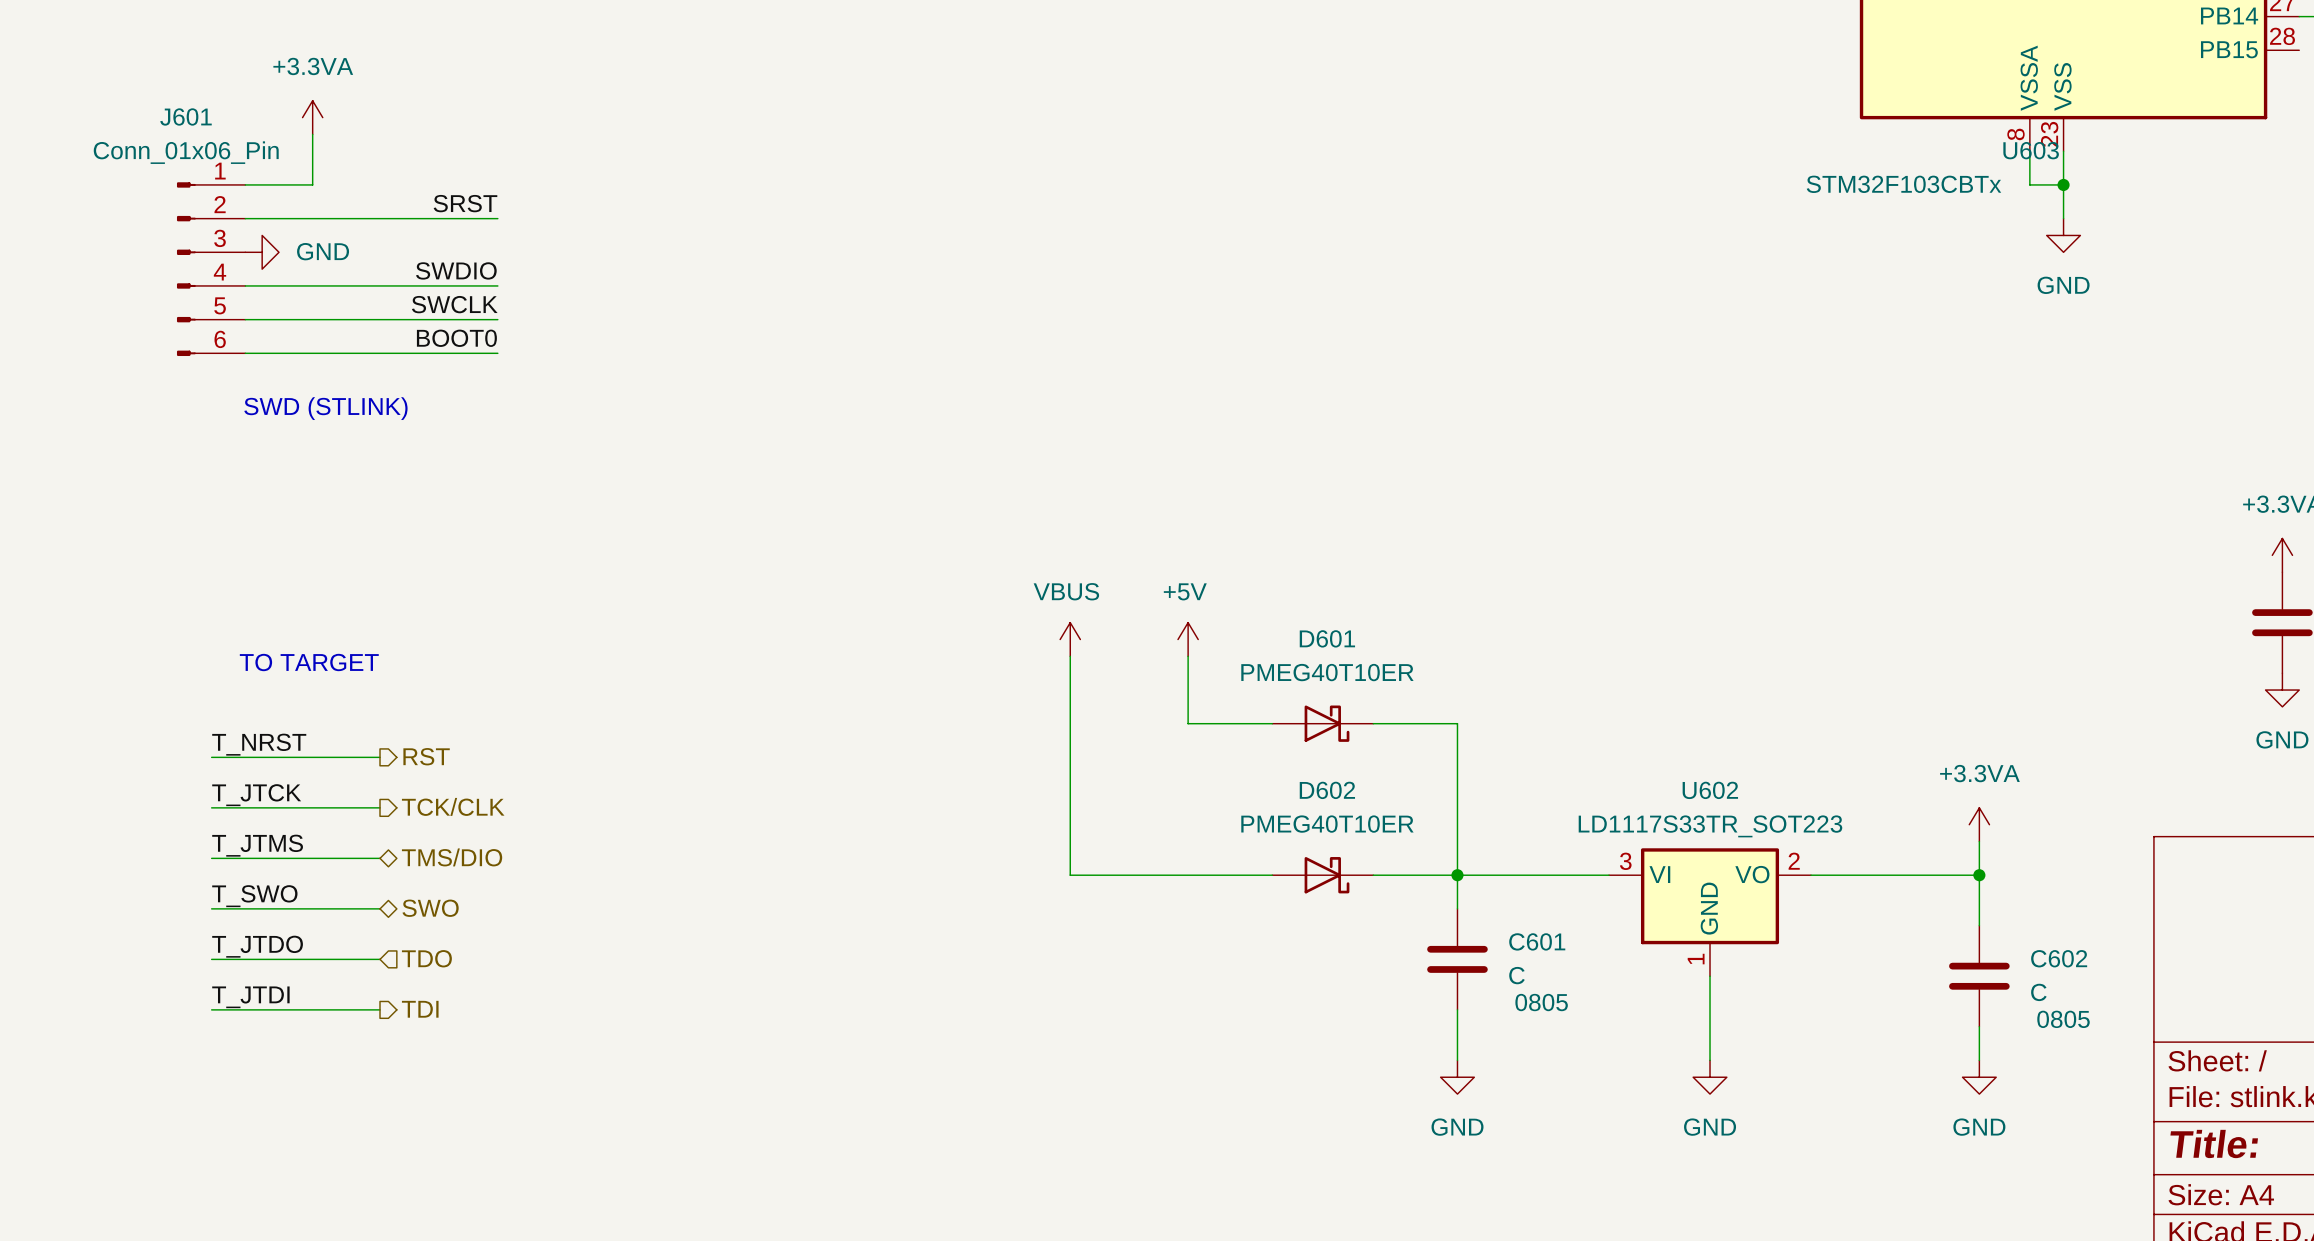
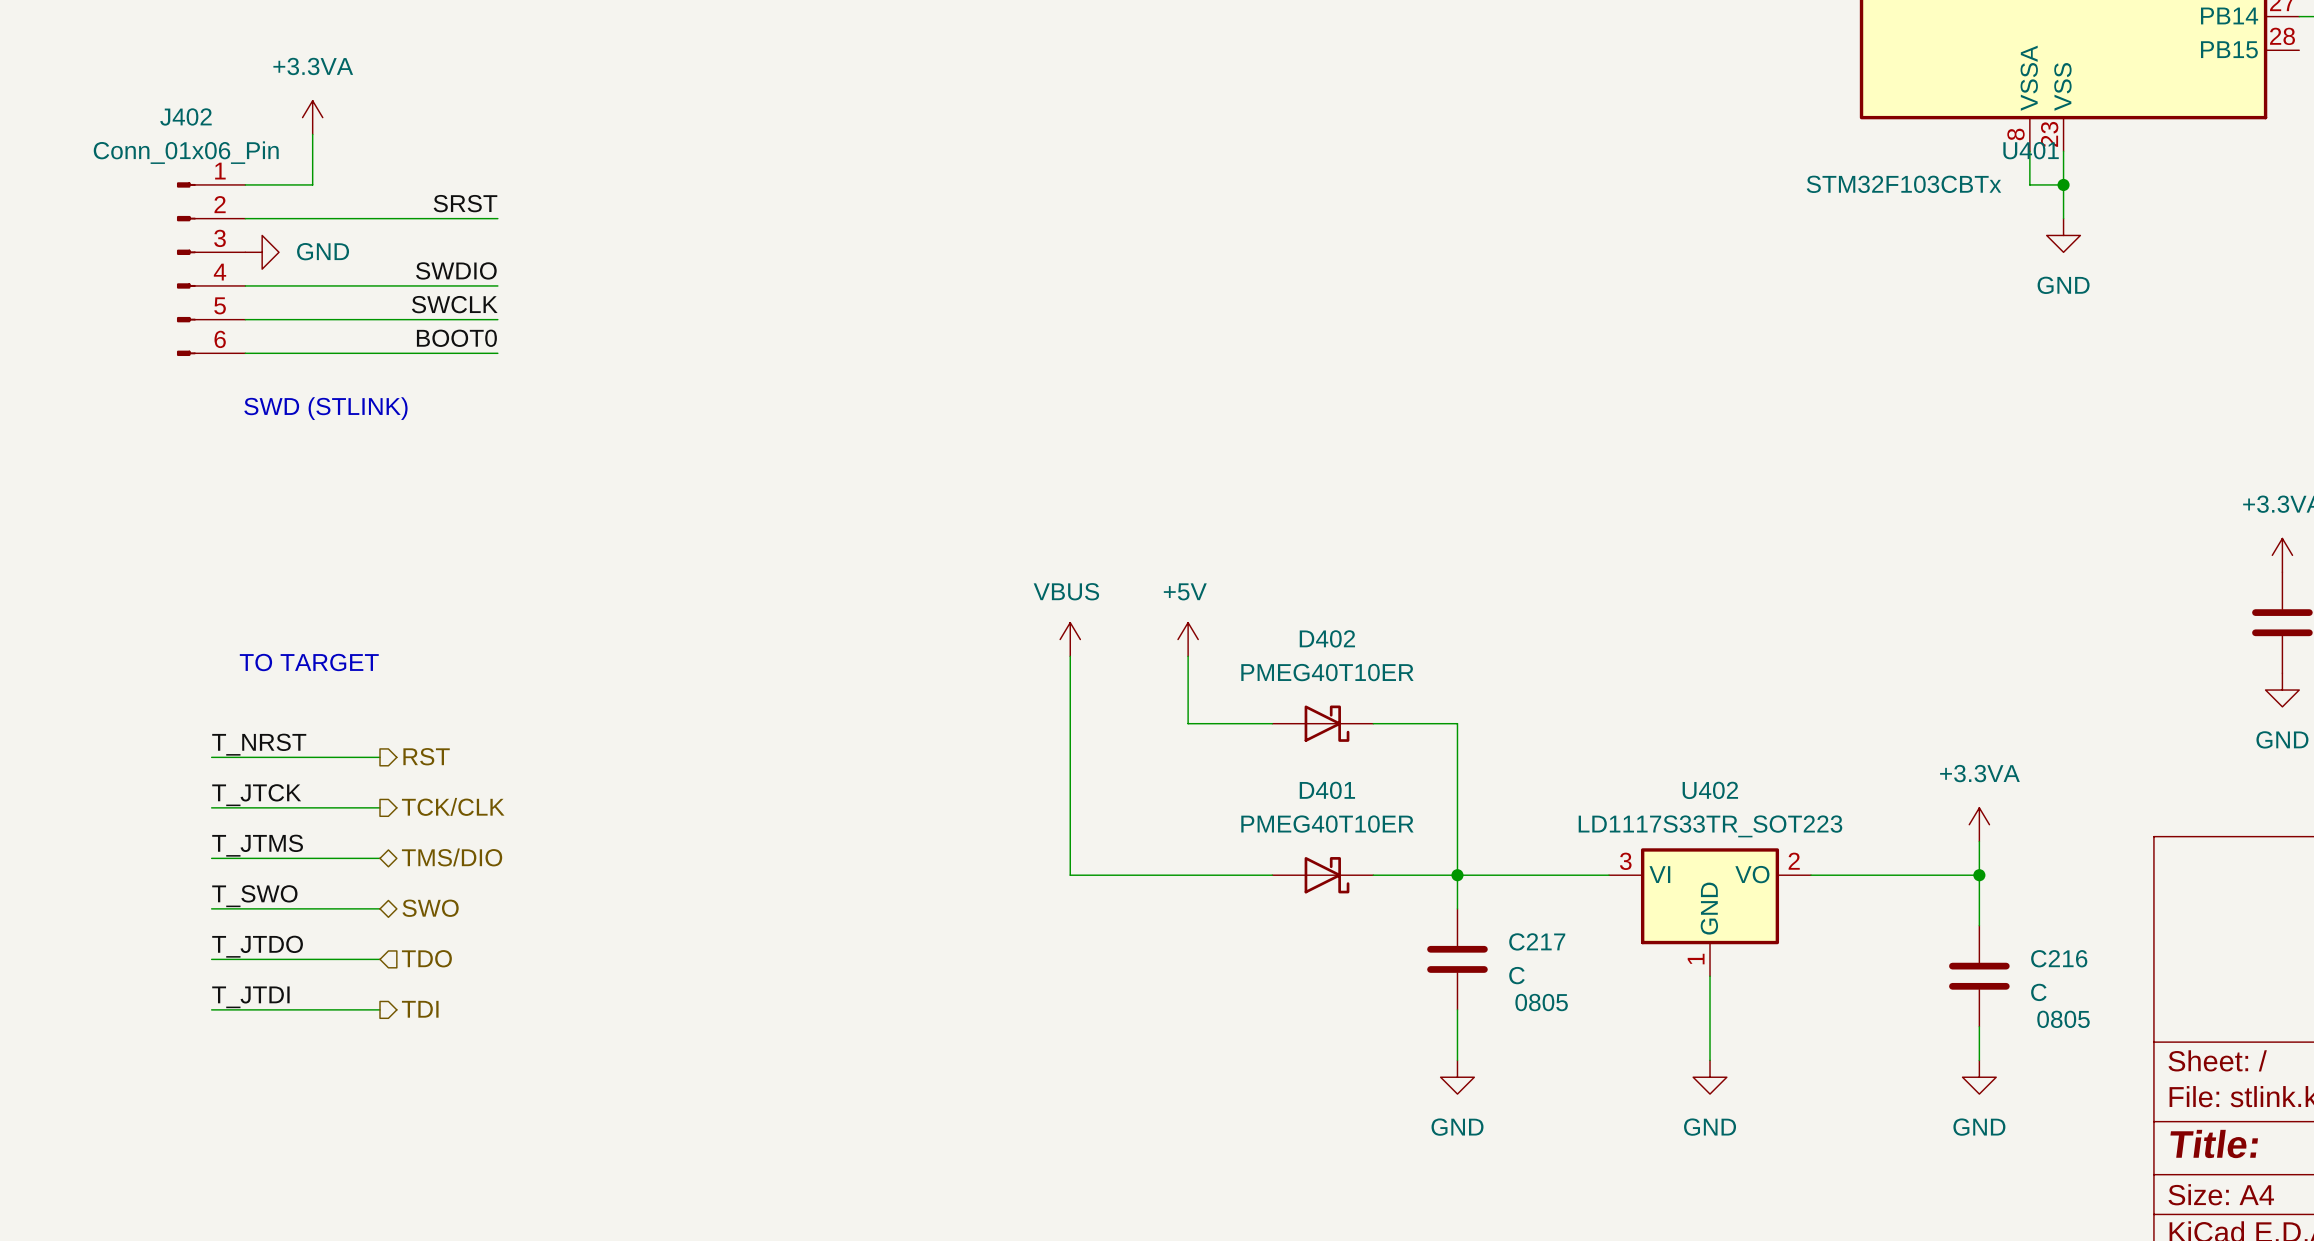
J601 name: J601 (185, 116) -> J402 (185, 116)
U603 name: U603 (2031, 150) -> U401 (2031, 150)
D601 name: D601 (1327, 638) -> D402 (1327, 638)
D602 name: D602 (1327, 790) -> D401 (1327, 790)
U602 name: U602 (1710, 790) -> U402 (1710, 790)
C601 name: C601 (1537, 941) -> C217 (1537, 941)
C602 name: C602 (2059, 958) -> C216 (2059, 958)

